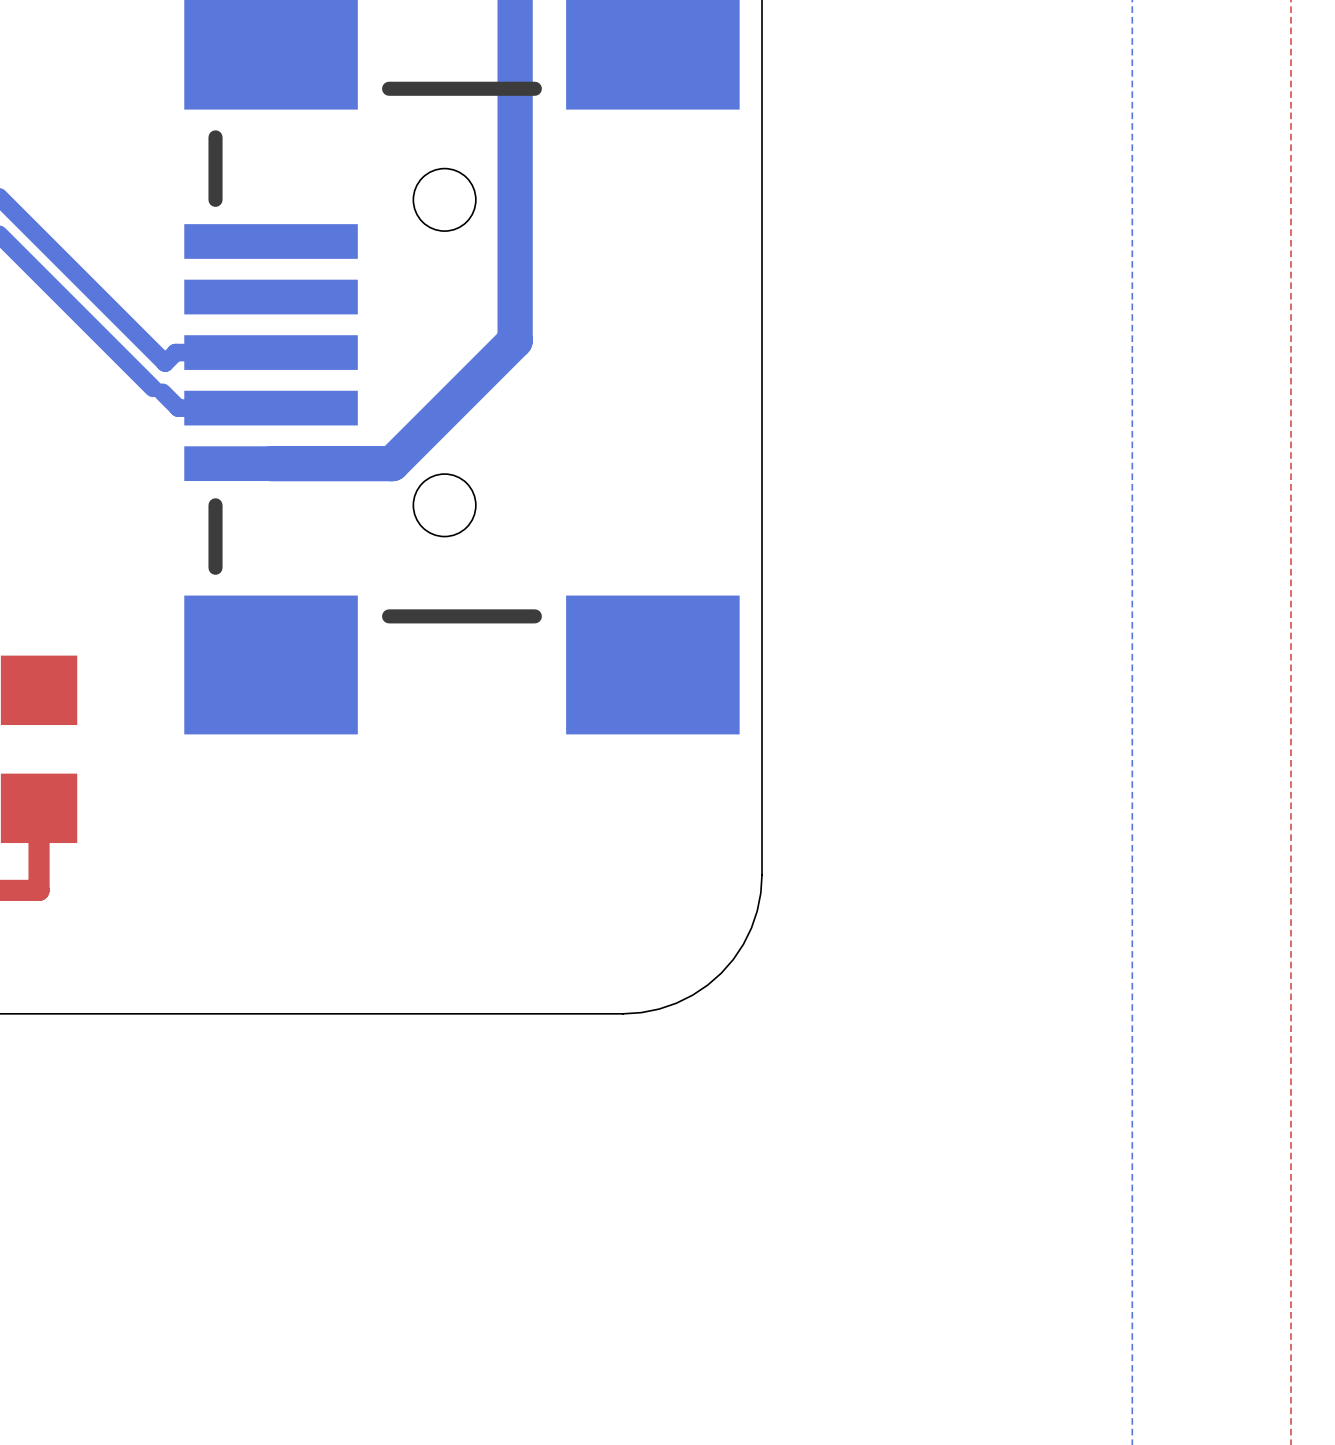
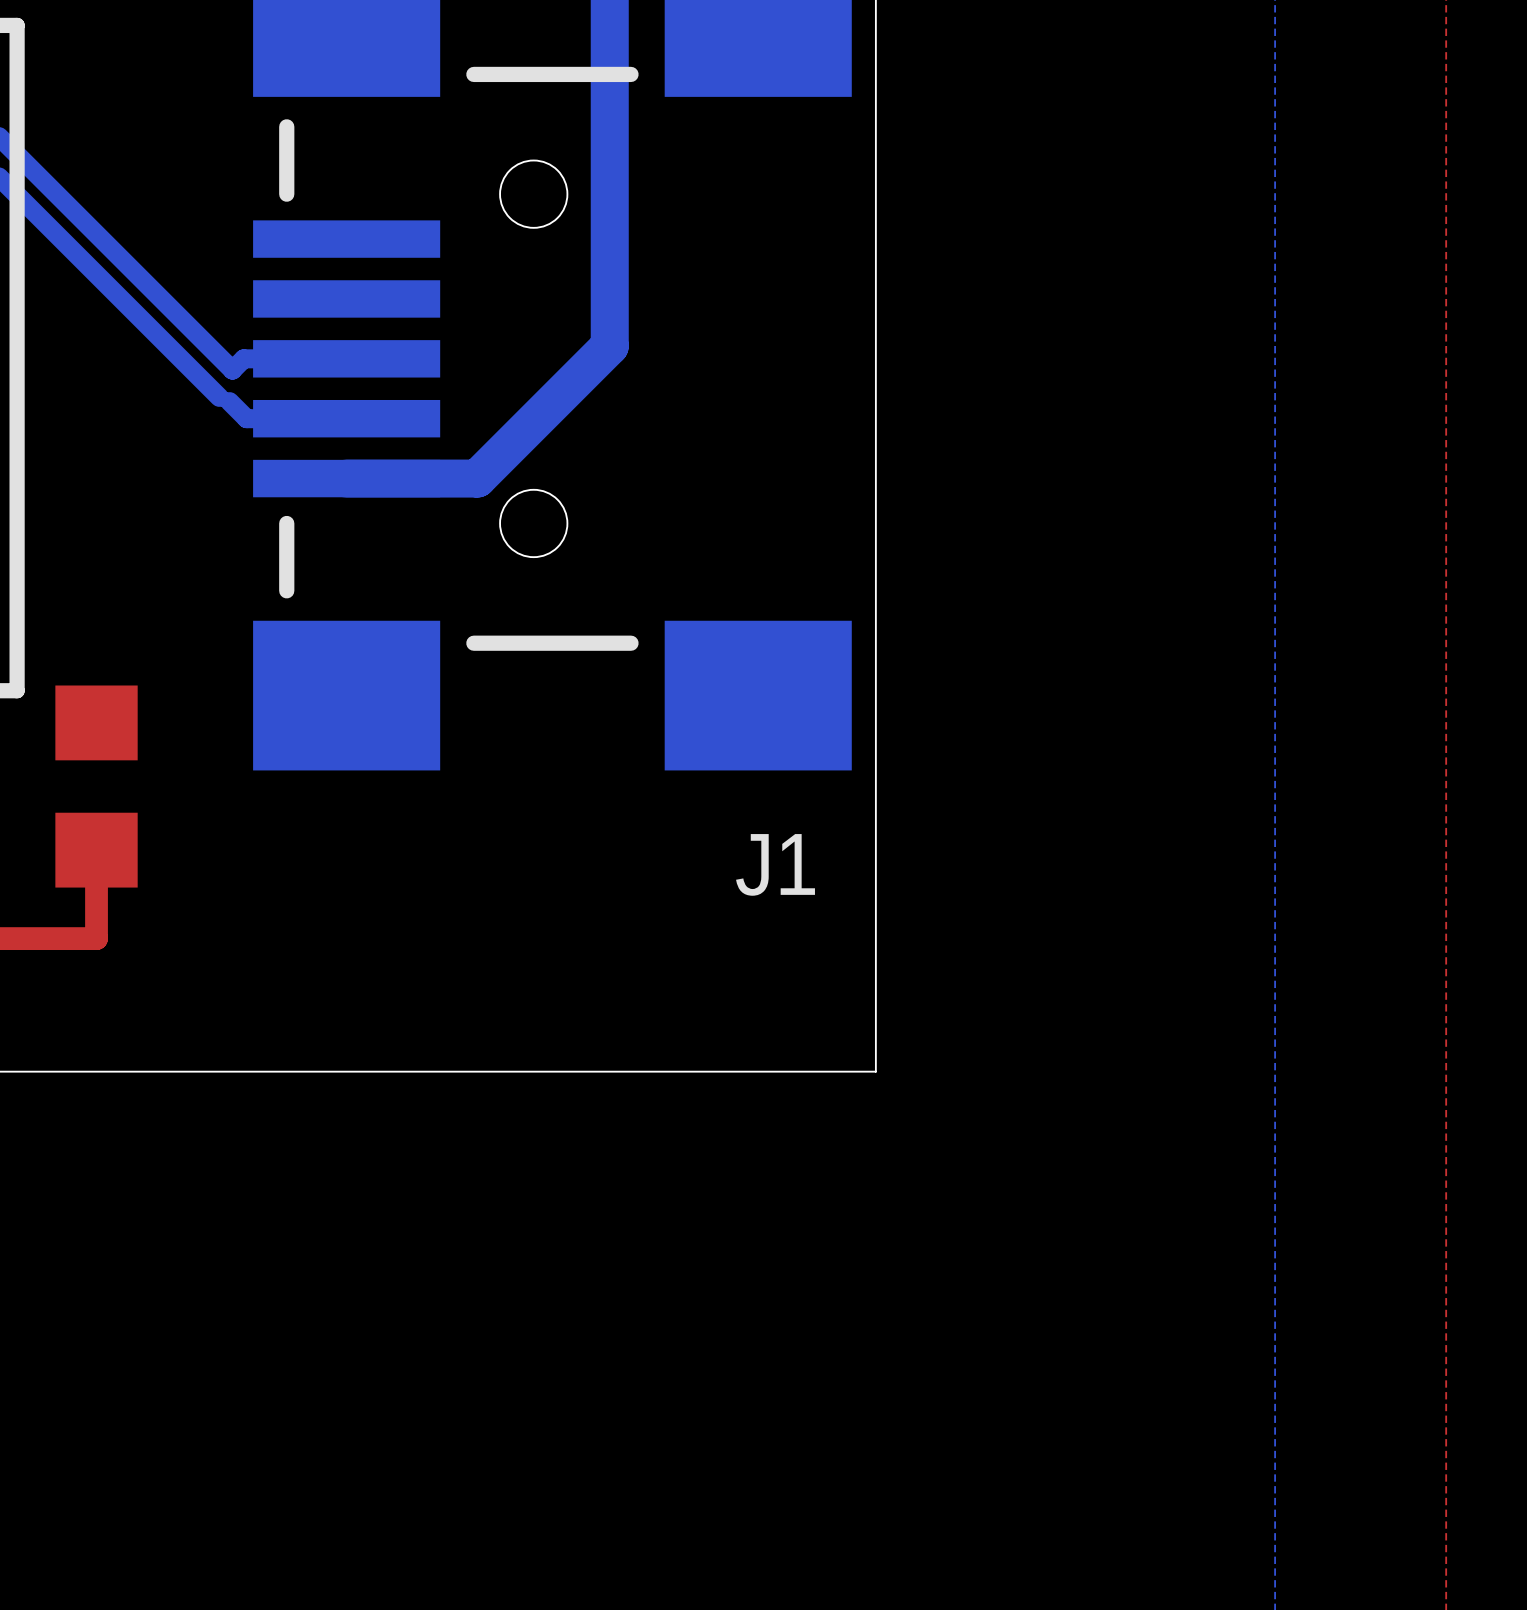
J1 name: none -> J1 (775, 864)
board edge: (762, 874) (757, 910) (751, 928) (743, 944) (721, 973) (692, 995) (676, 1003) (659, 1009) (623, 1013) -> (875, 921) (875, 1071) (726, 1071)

